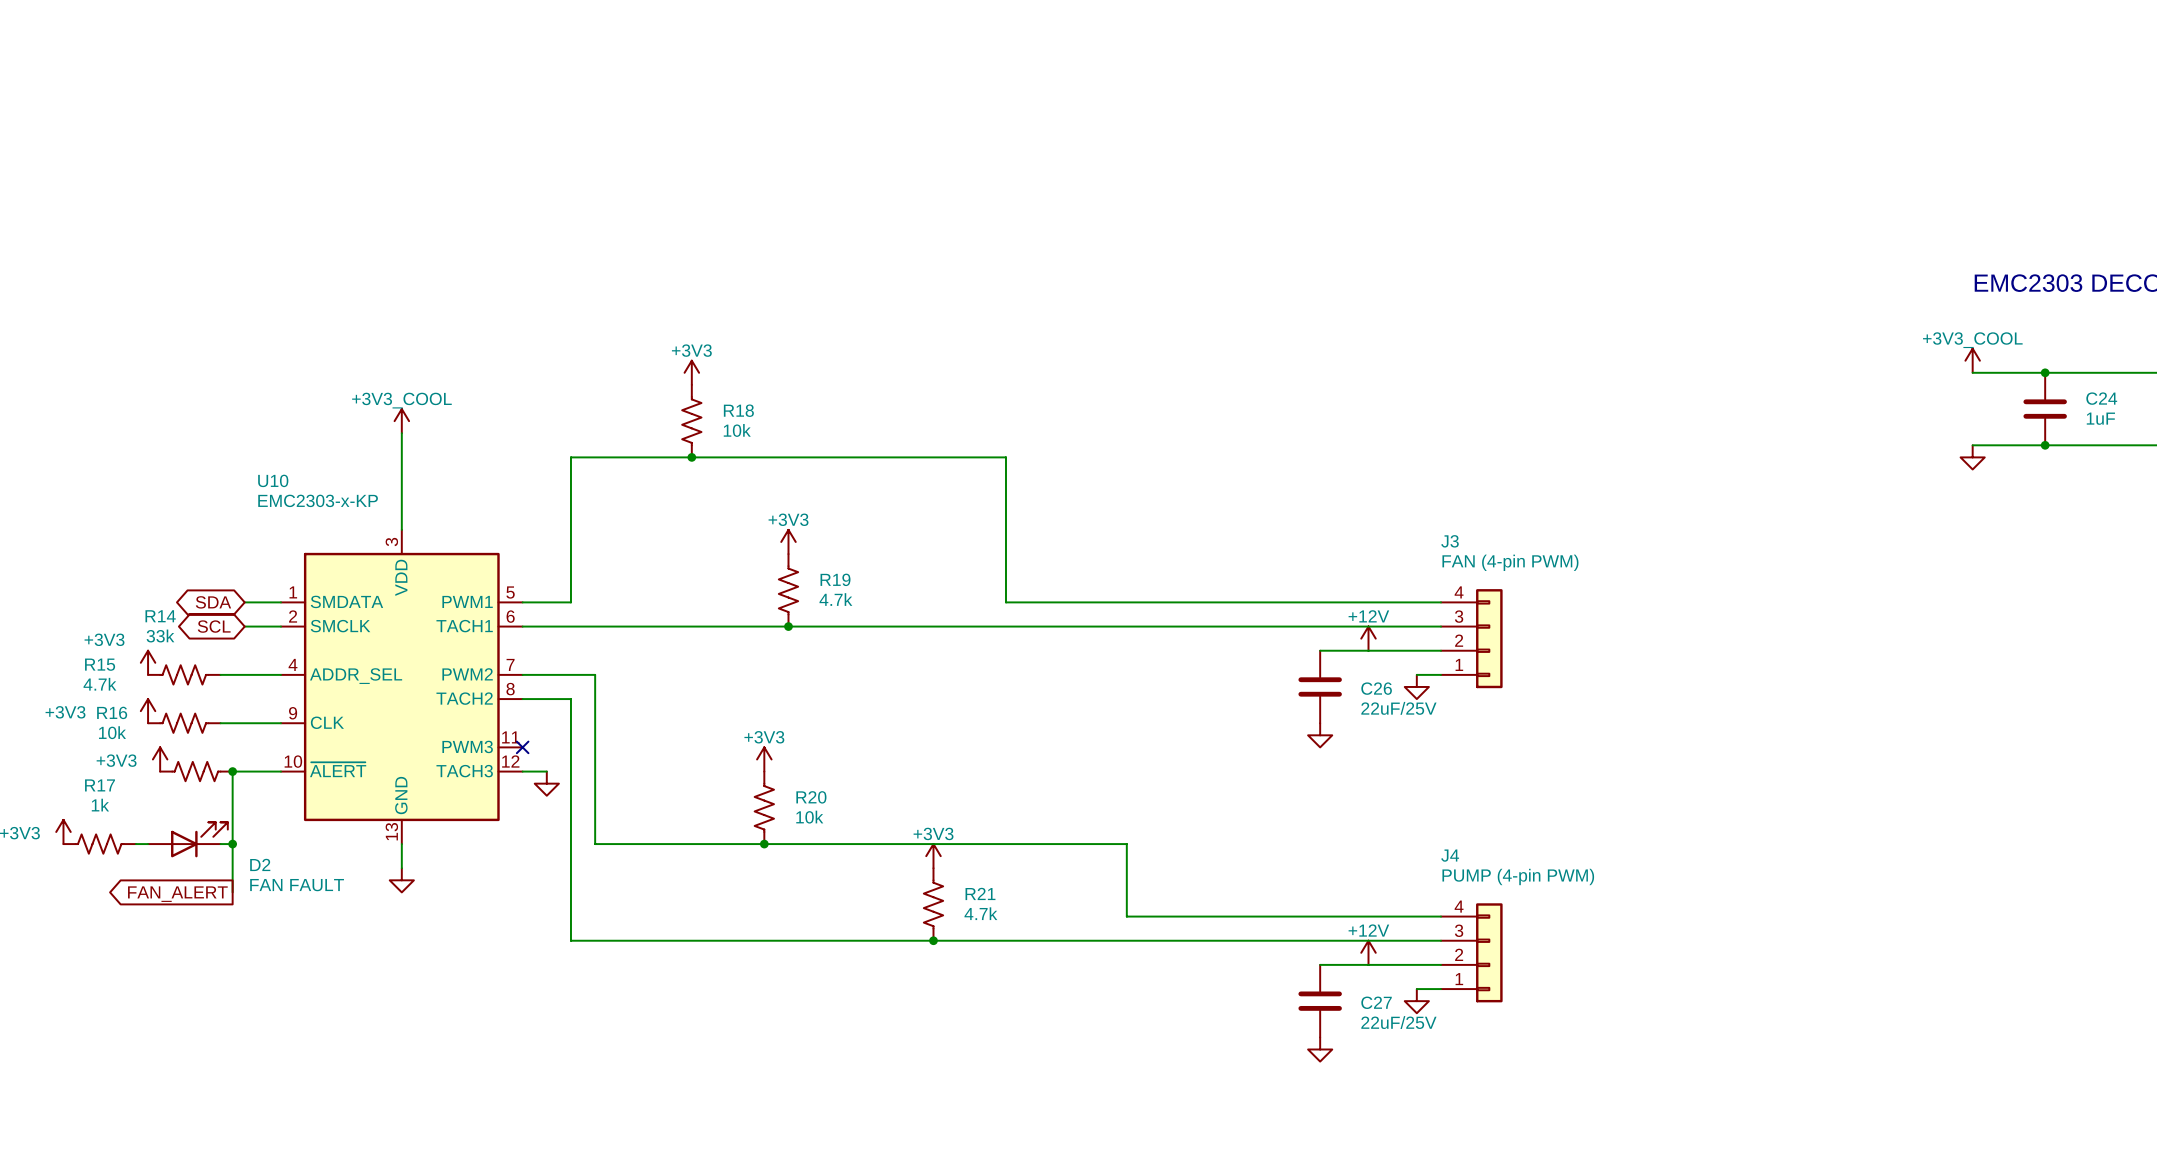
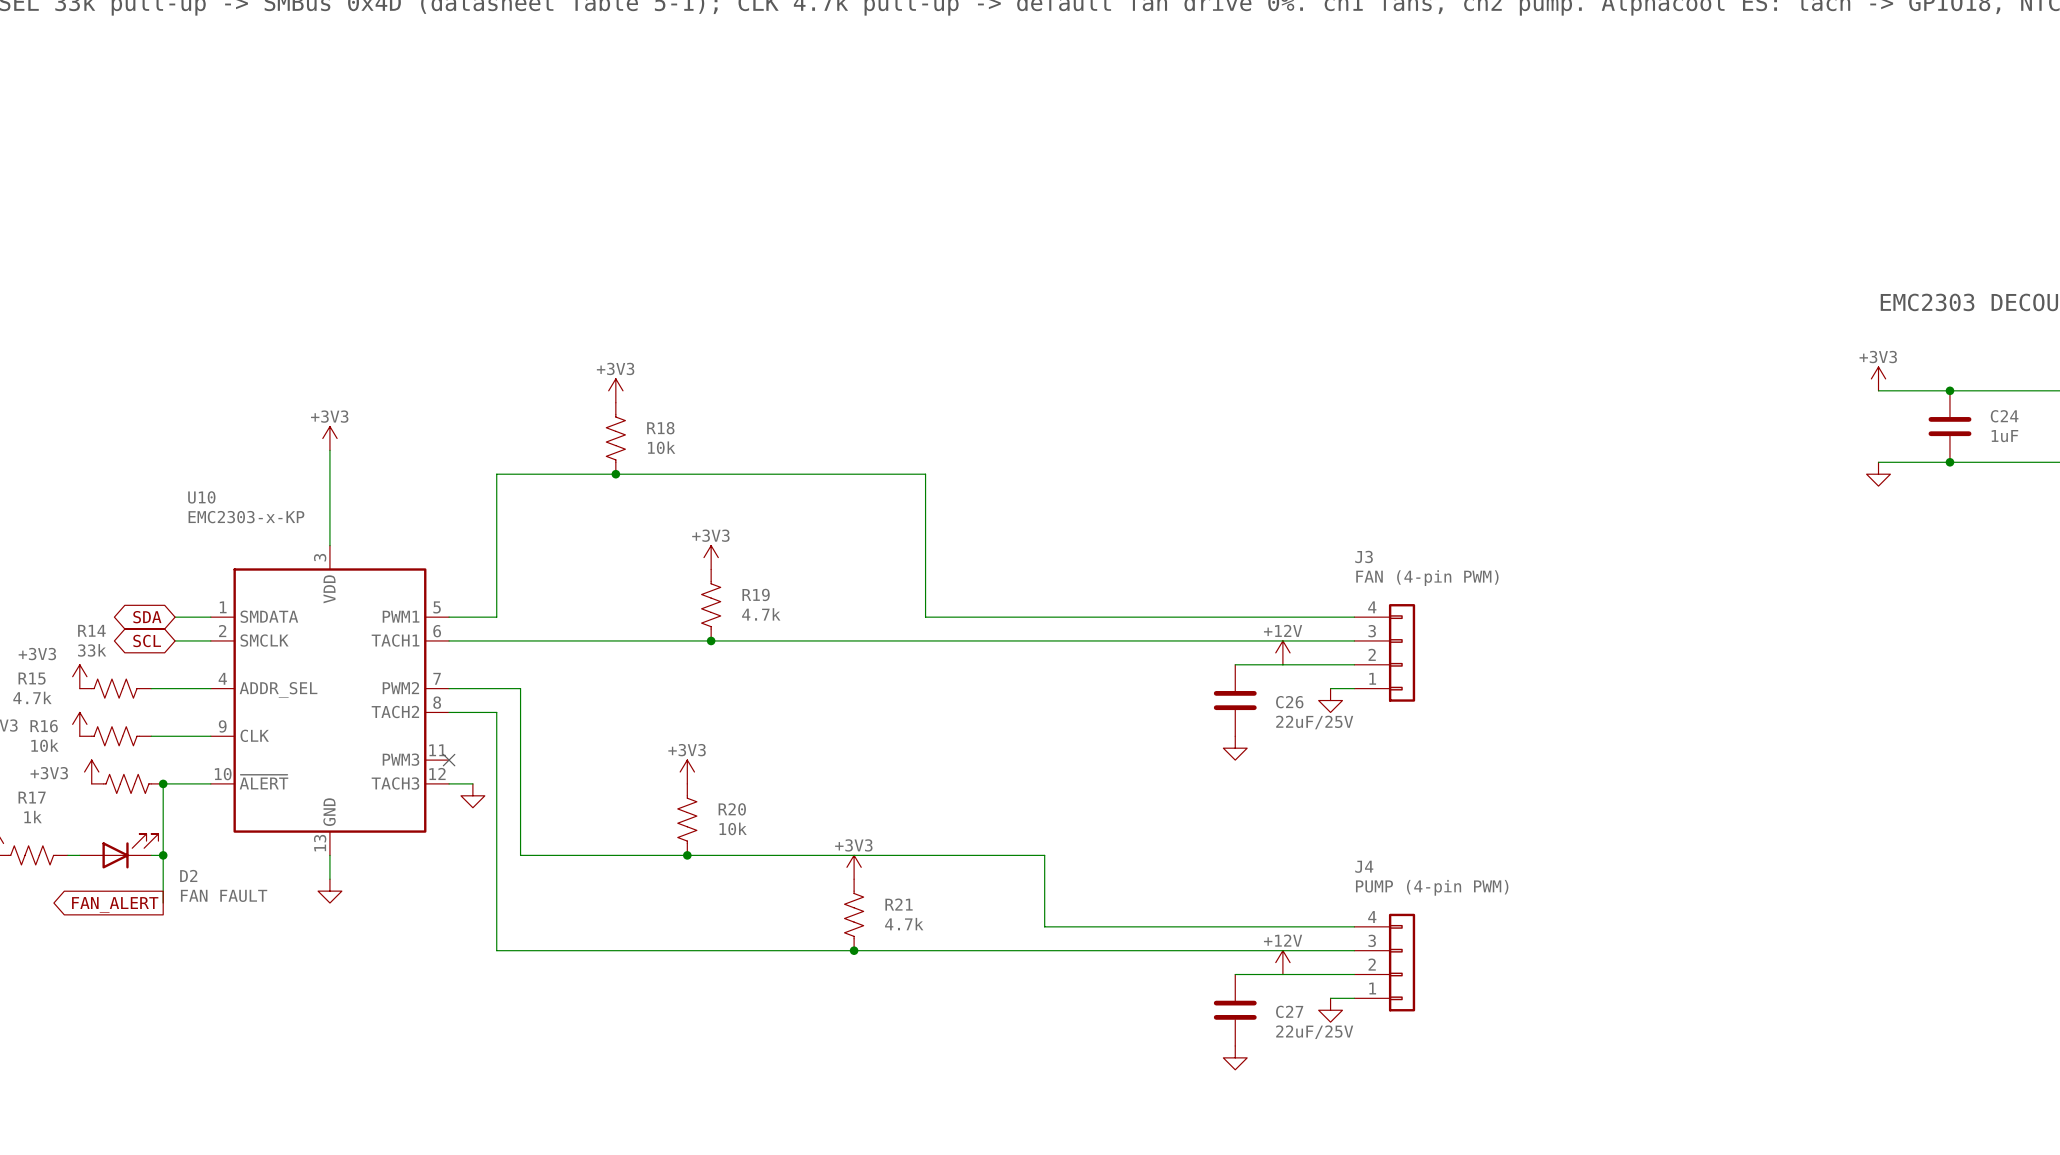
power symbol: +3V3_COOL (1972, 360) -> +3V3 (1878, 378)
power symbol: +3V3_COOL (401, 421) -> +3V3 (329, 438)

